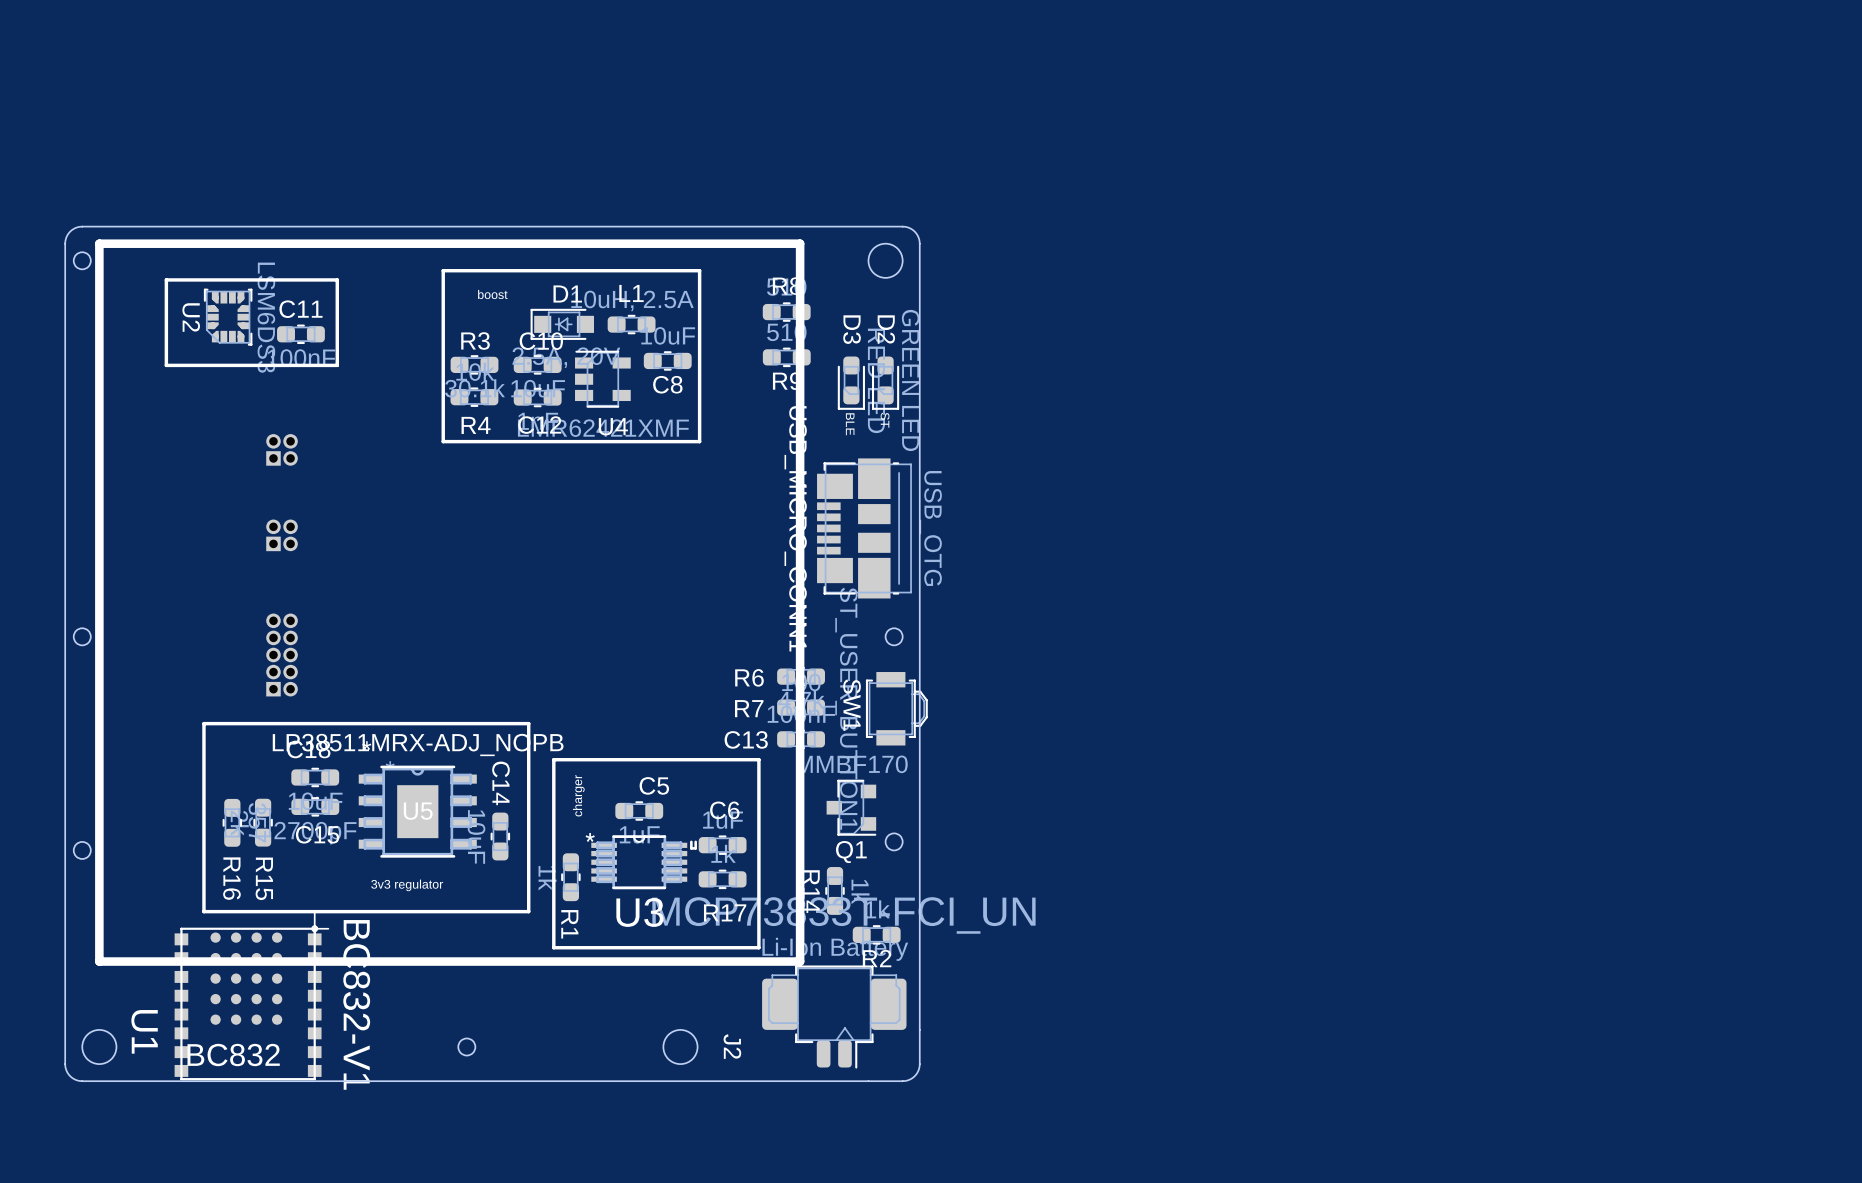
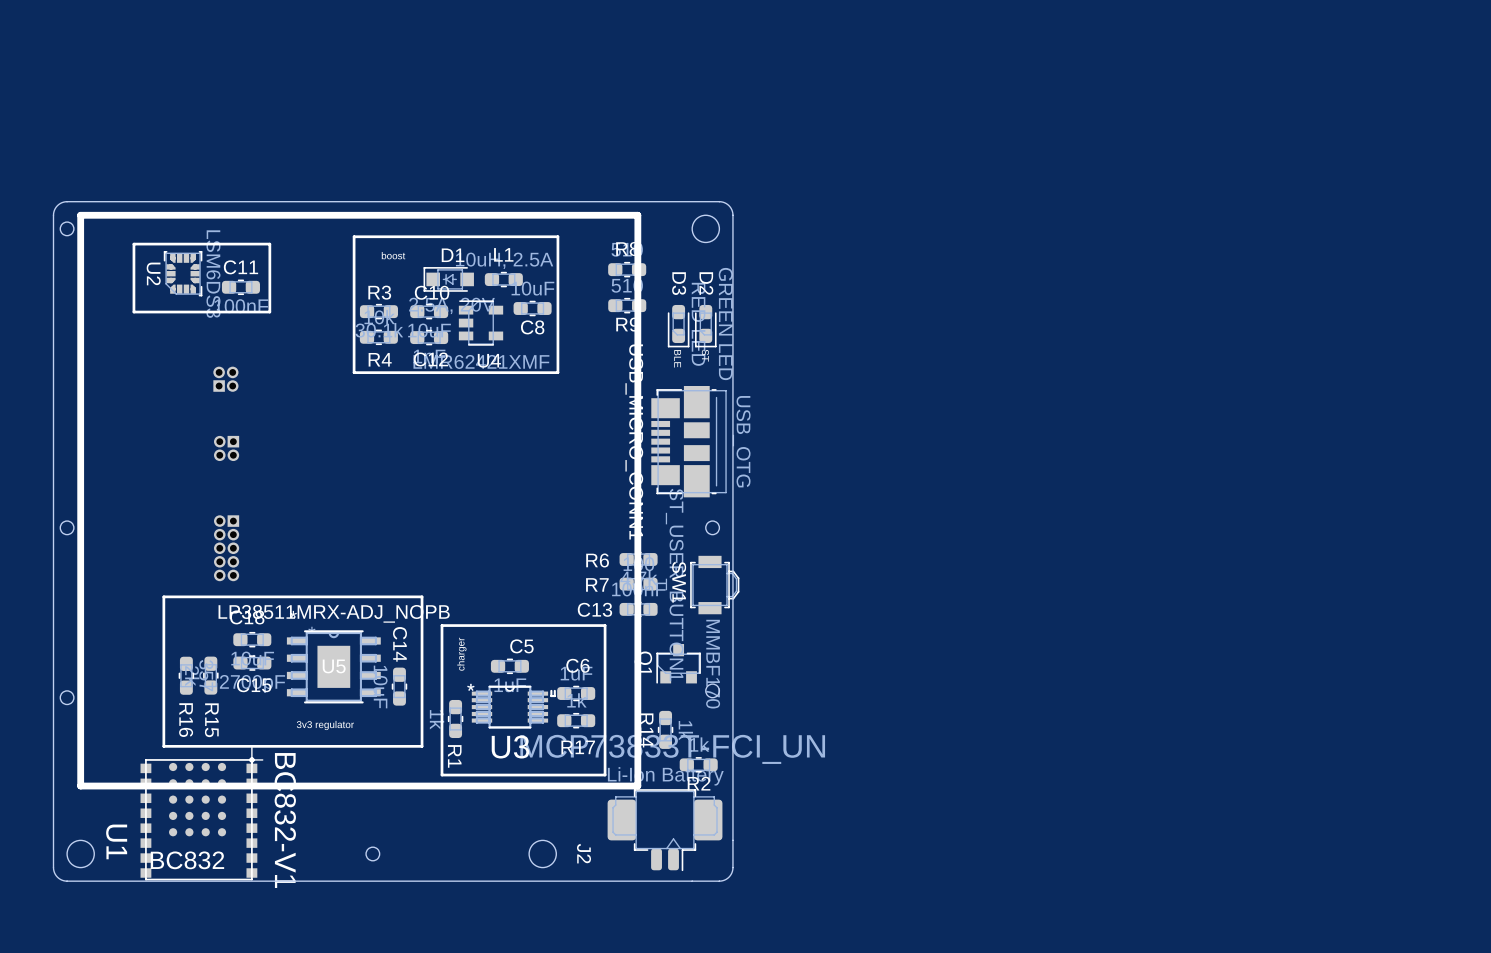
part rotation: 0° (282, 535) -> 180° (226, 448)
part rotation: 0° (282, 654) -> 180° (226, 548)
Q1 rotation: 0° (851, 807) -> 90° clockwise (678, 663)

